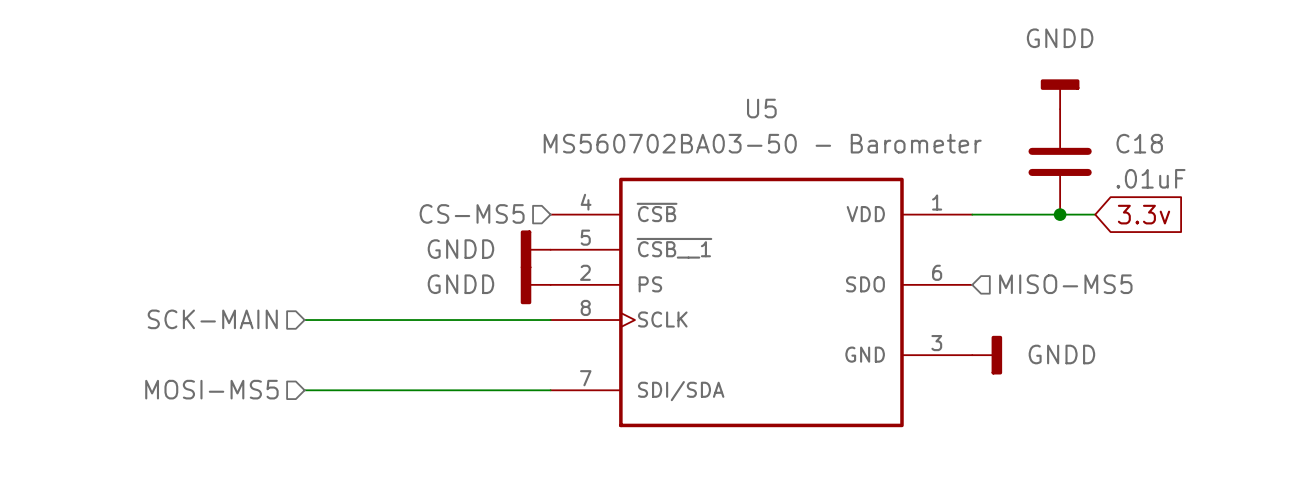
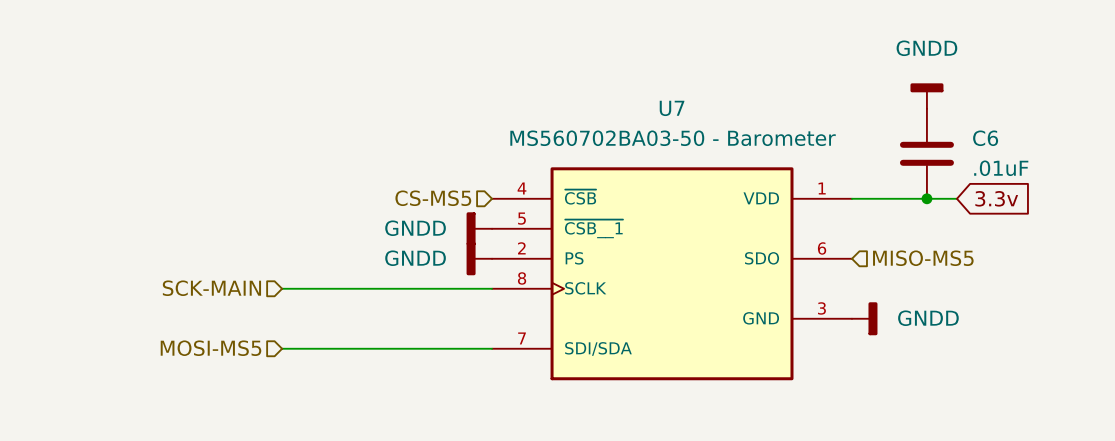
U5 name: U5 (761, 108) -> U7 (672, 108)
C18 name: C18 (1139, 143) -> C6 (985, 138)

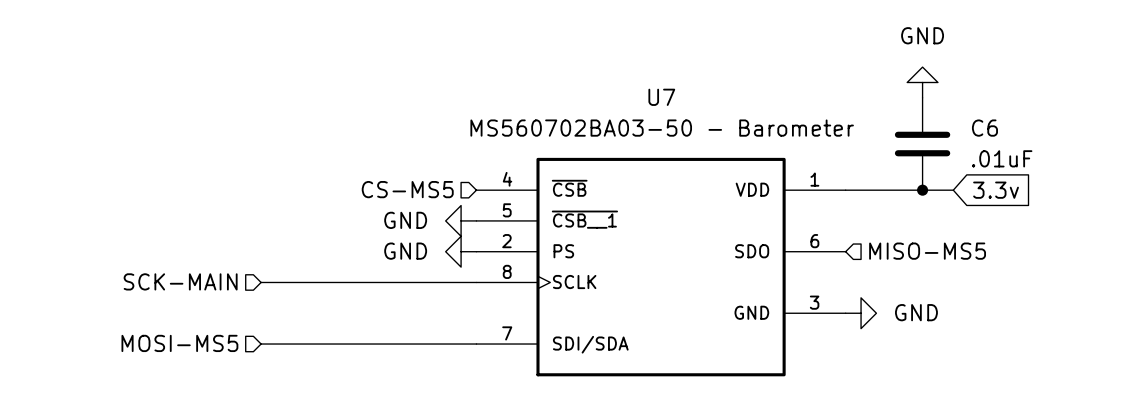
power symbol: GNDD (926, 96) -> GND (922, 82)
power symbol: GNDD (479, 228) -> GND (461, 220)
power symbol: GNDD (479, 258) -> GND (461, 251)
power symbol: GNDD (864, 318) -> GND (861, 313)

